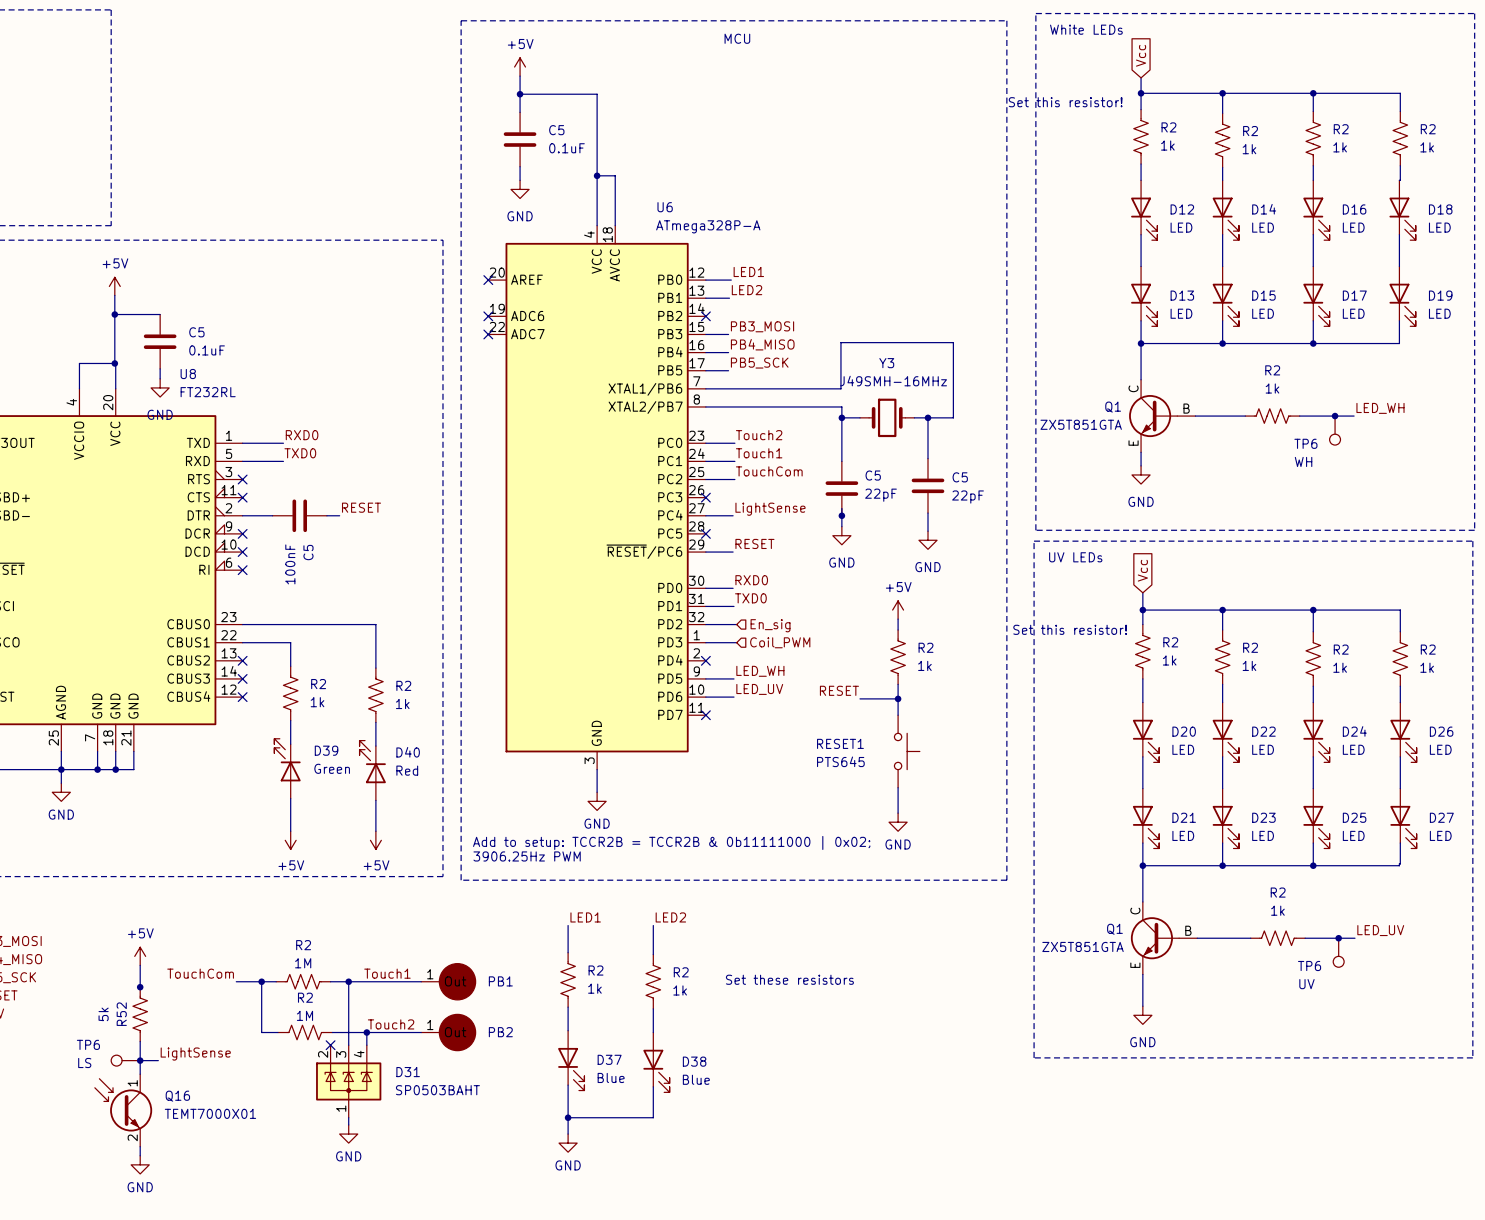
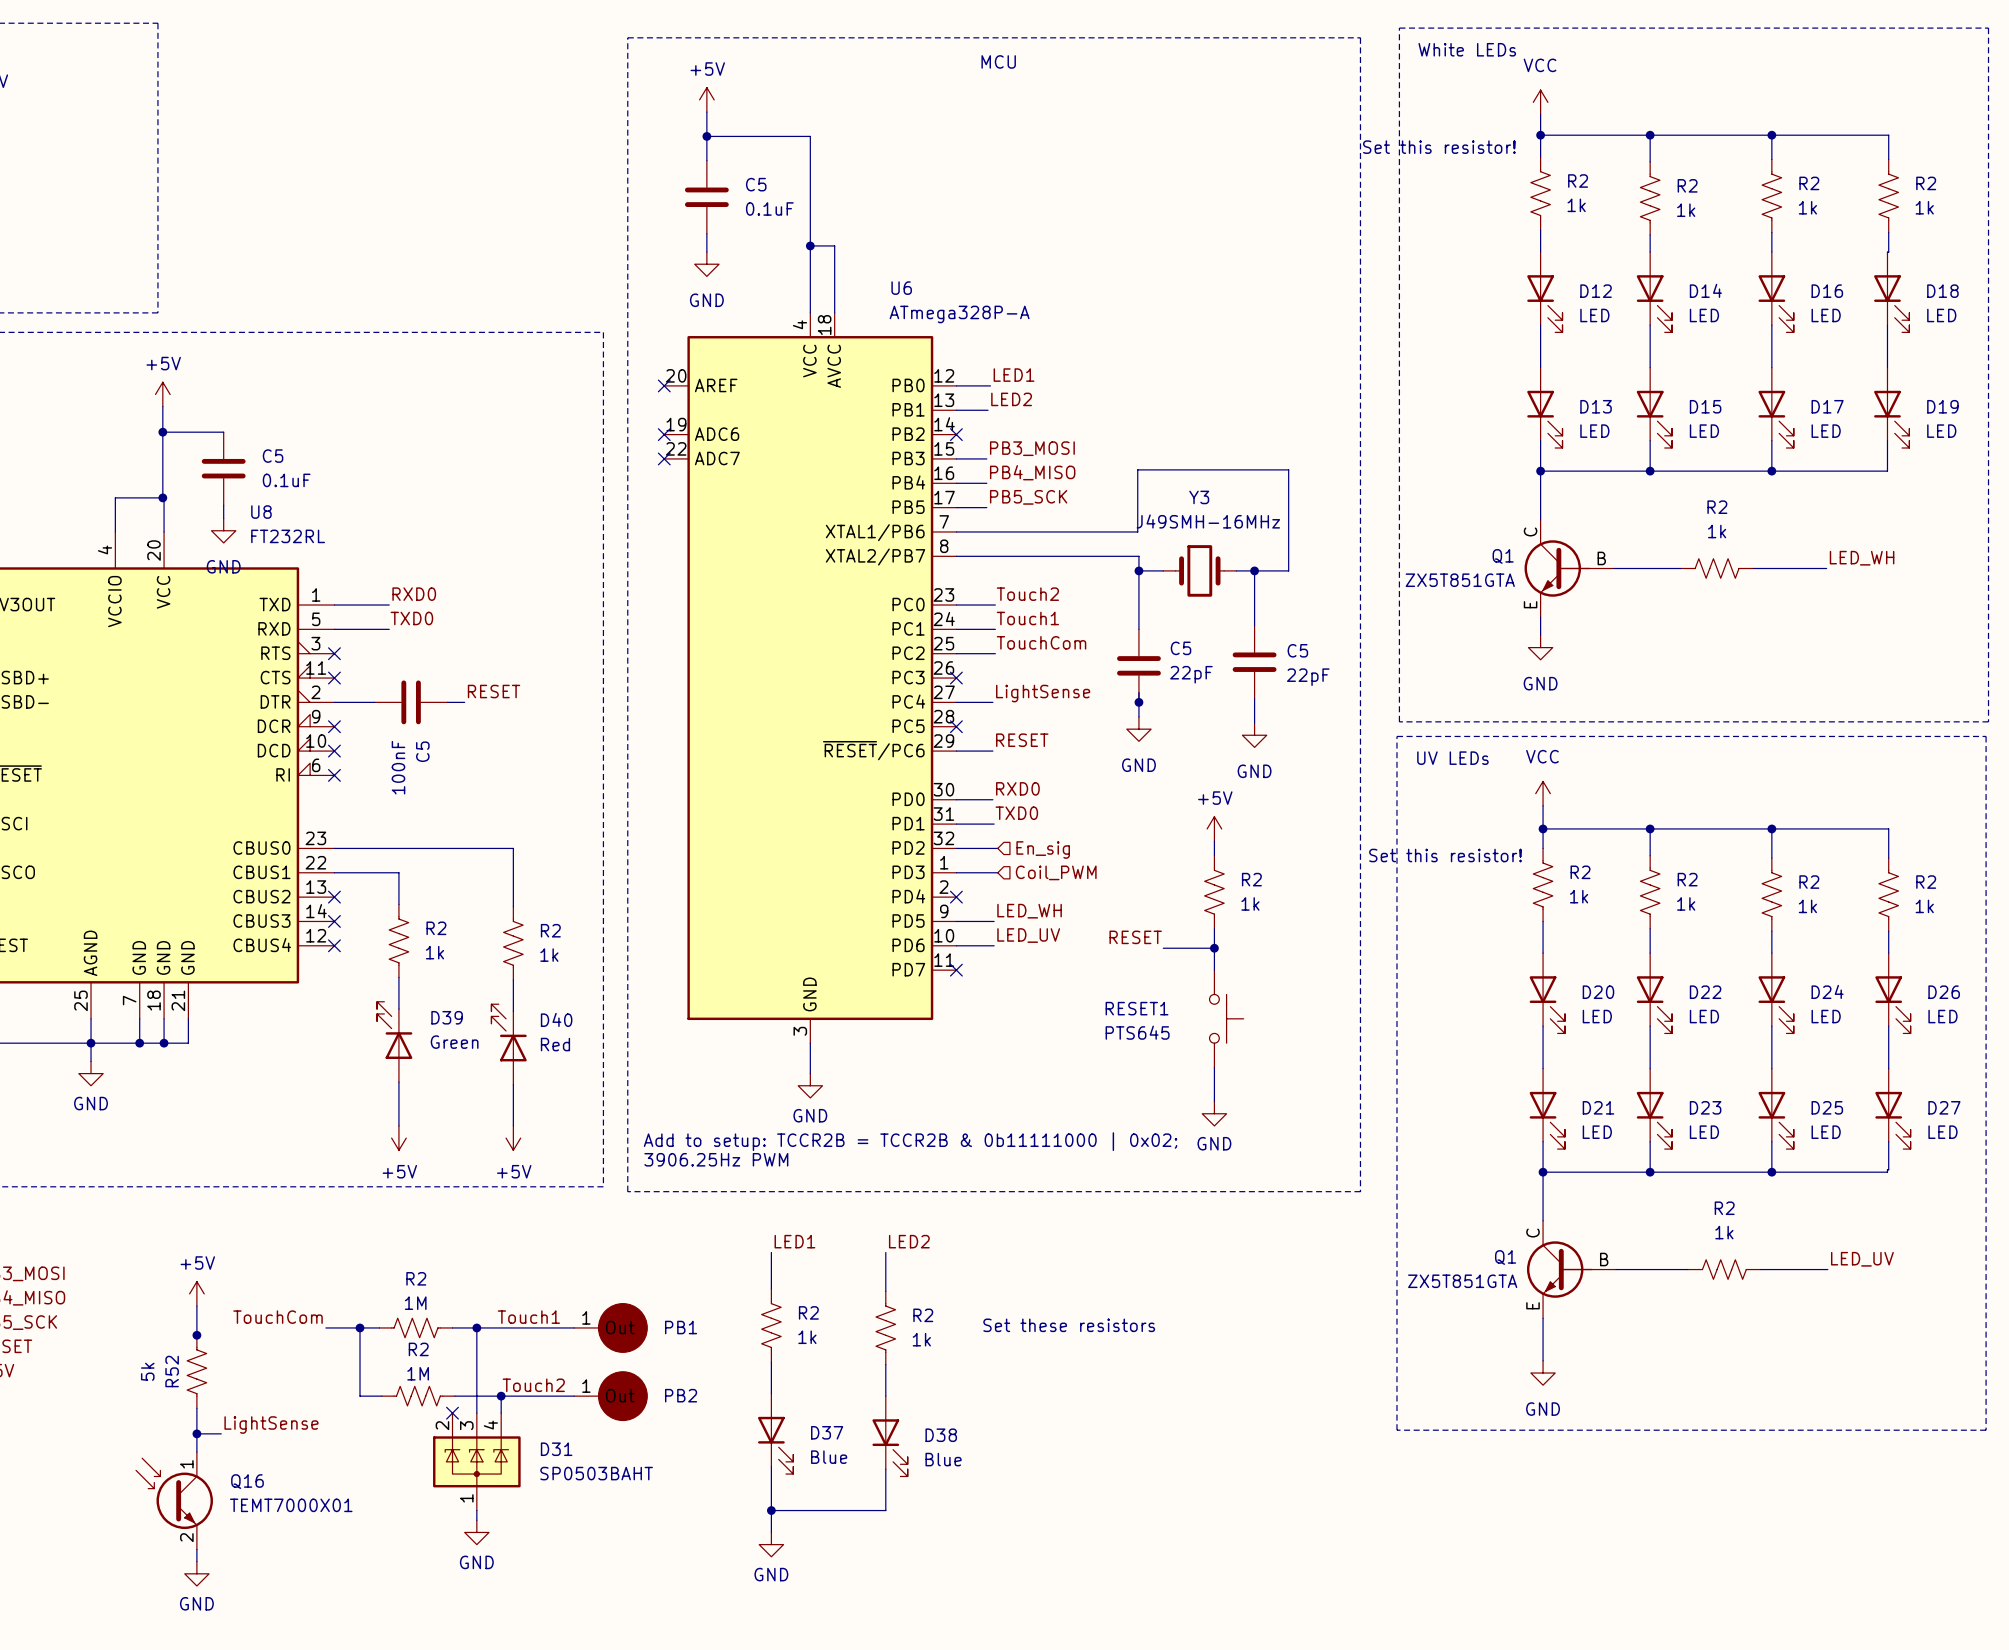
global label: Vcc (1141, 55) -> none
power symbol: none -> VCC (1540, 102)
junction: (1335, 416) -> none
TP6: WH (1335, 430) -> none
global label: Vcc (1142, 570) -> none
power symbol: none -> VCC (1543, 793)
junction: (1338, 938) -> none
TP6: UV (1338, 952) -> none
TP6: LS (125, 1060) -> none

